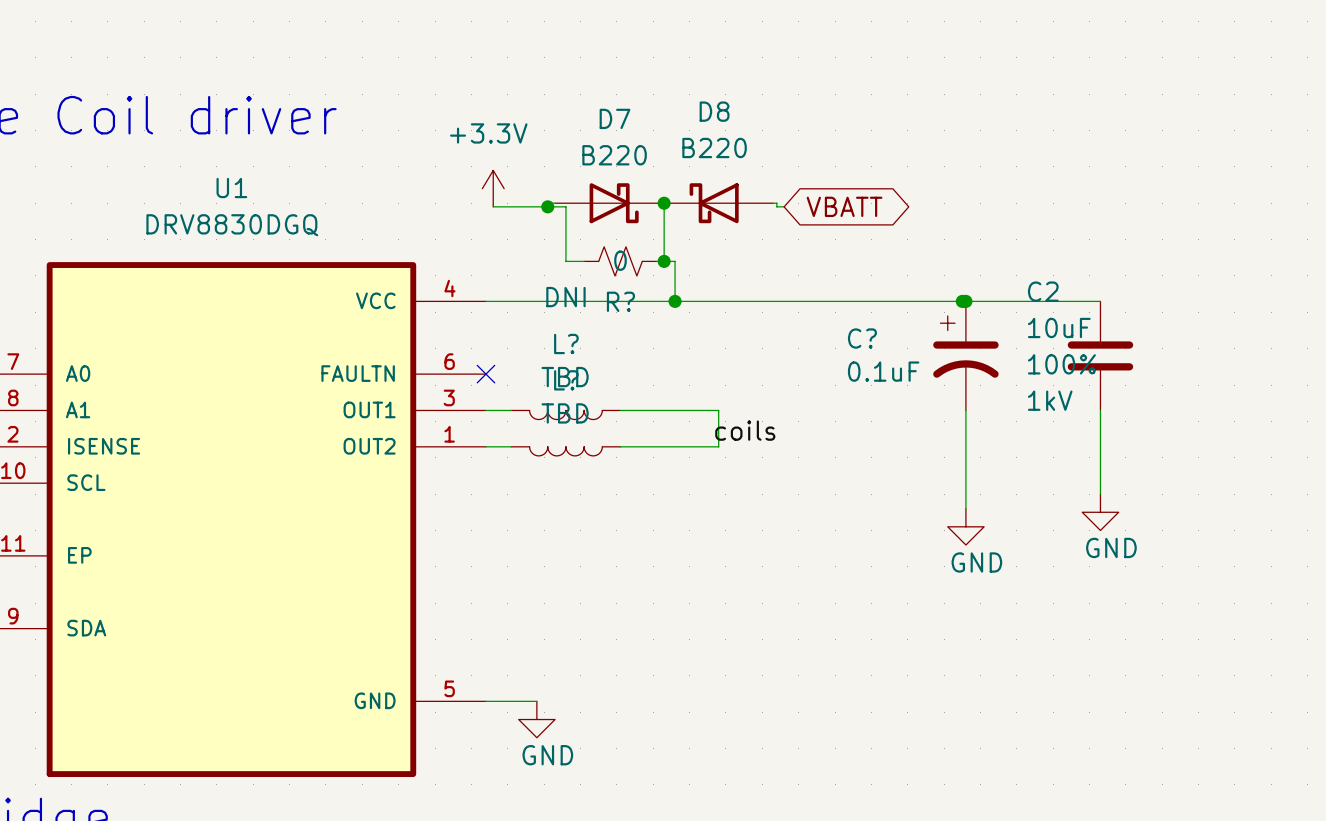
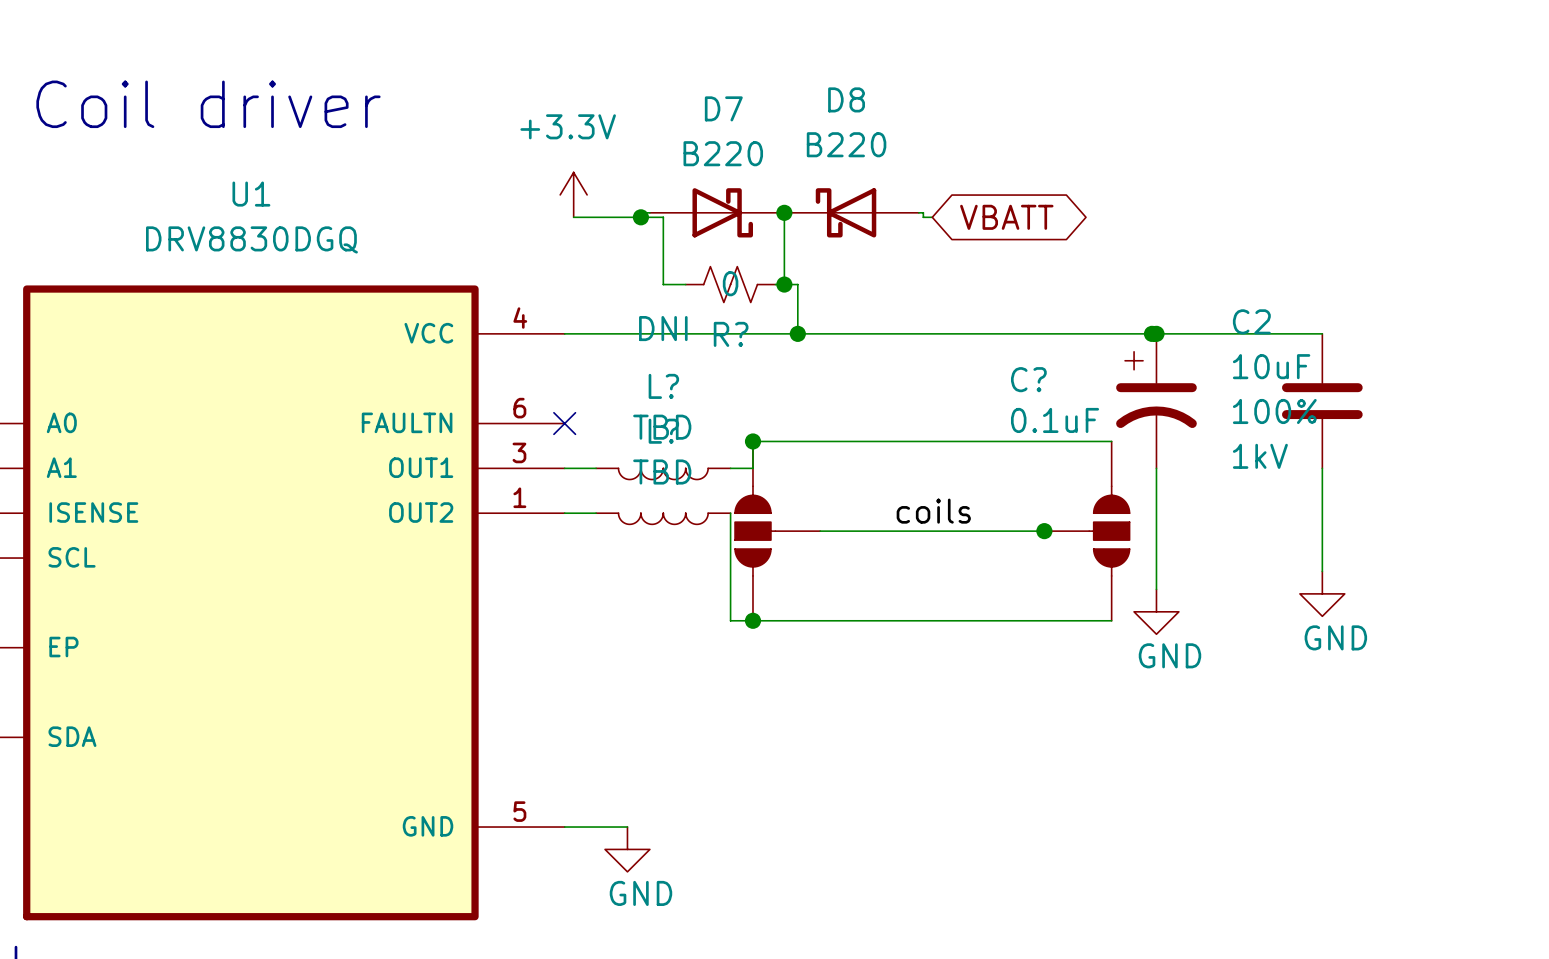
junction: none -> (752, 441)
wire: (638, 410) (718, 410) (718, 446) (620, 446) -> (752, 468) (752, 441) (1111, 441)
label position: coils (745, 430) -> coils (933, 511)
wire: none -> (730, 513) (730, 620) (1111, 620)
part: none -> (777, 531)
wire: none -> (820, 531) (1044, 531) (1044, 535)
junction: none -> (1044, 531)
part: none -> (1086, 531)
junction: none -> (752, 620)

